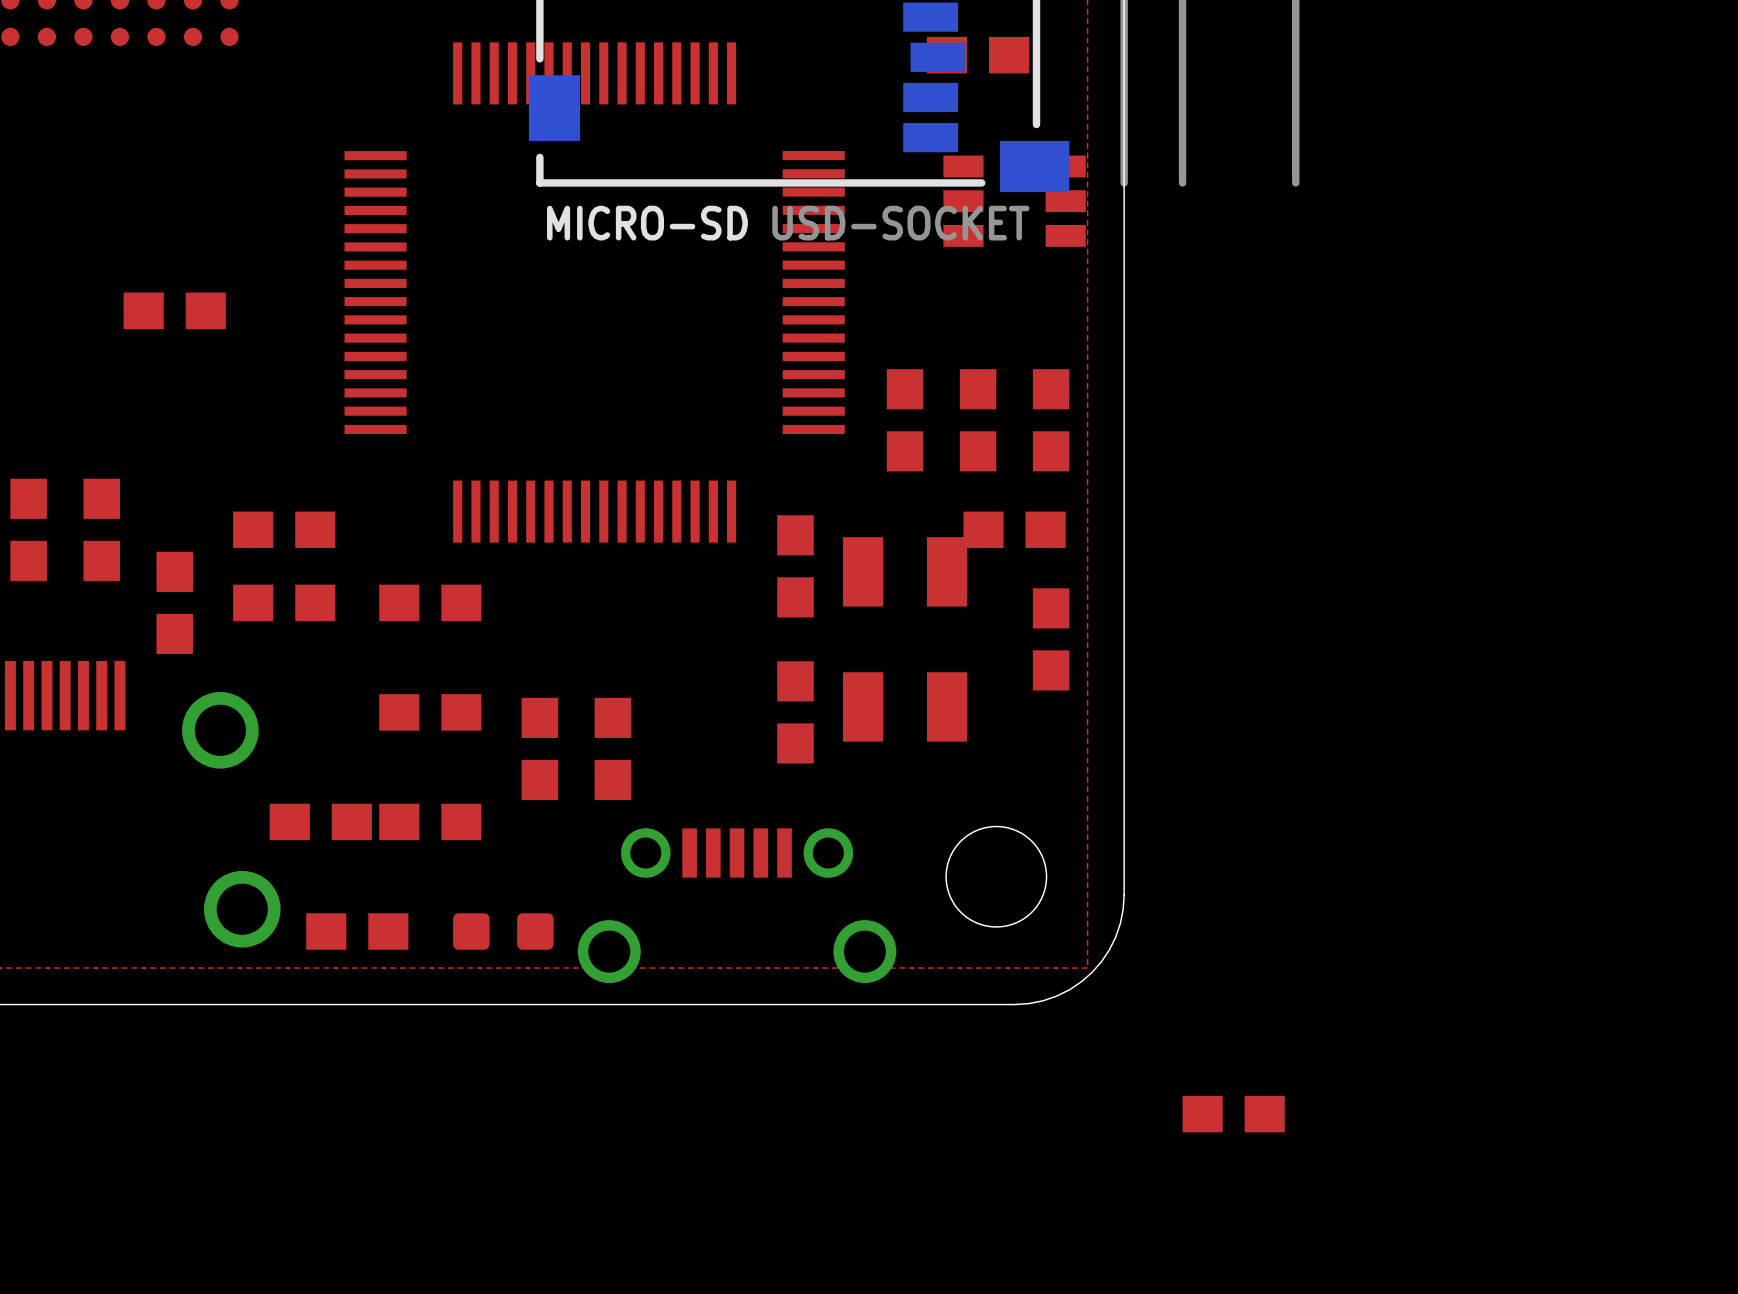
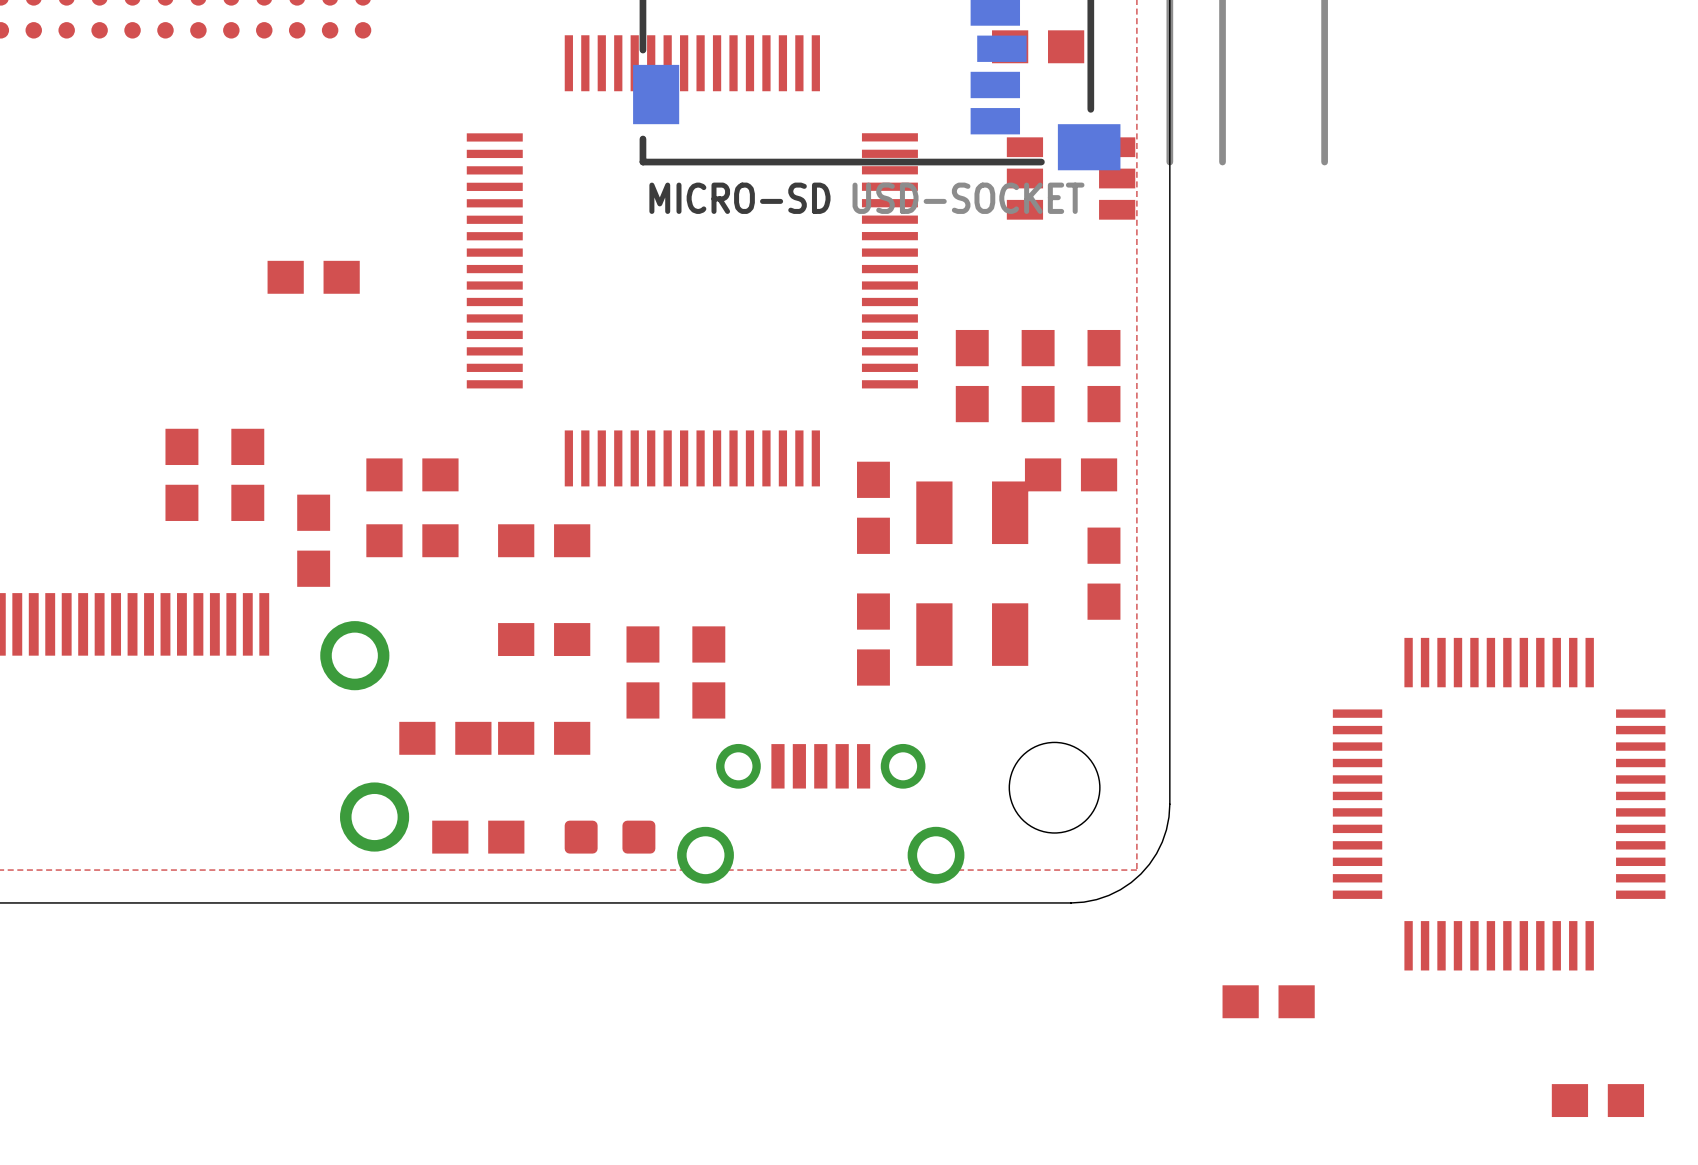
part: none -> (1499, 804)
part: none -> (1597, 1100)

